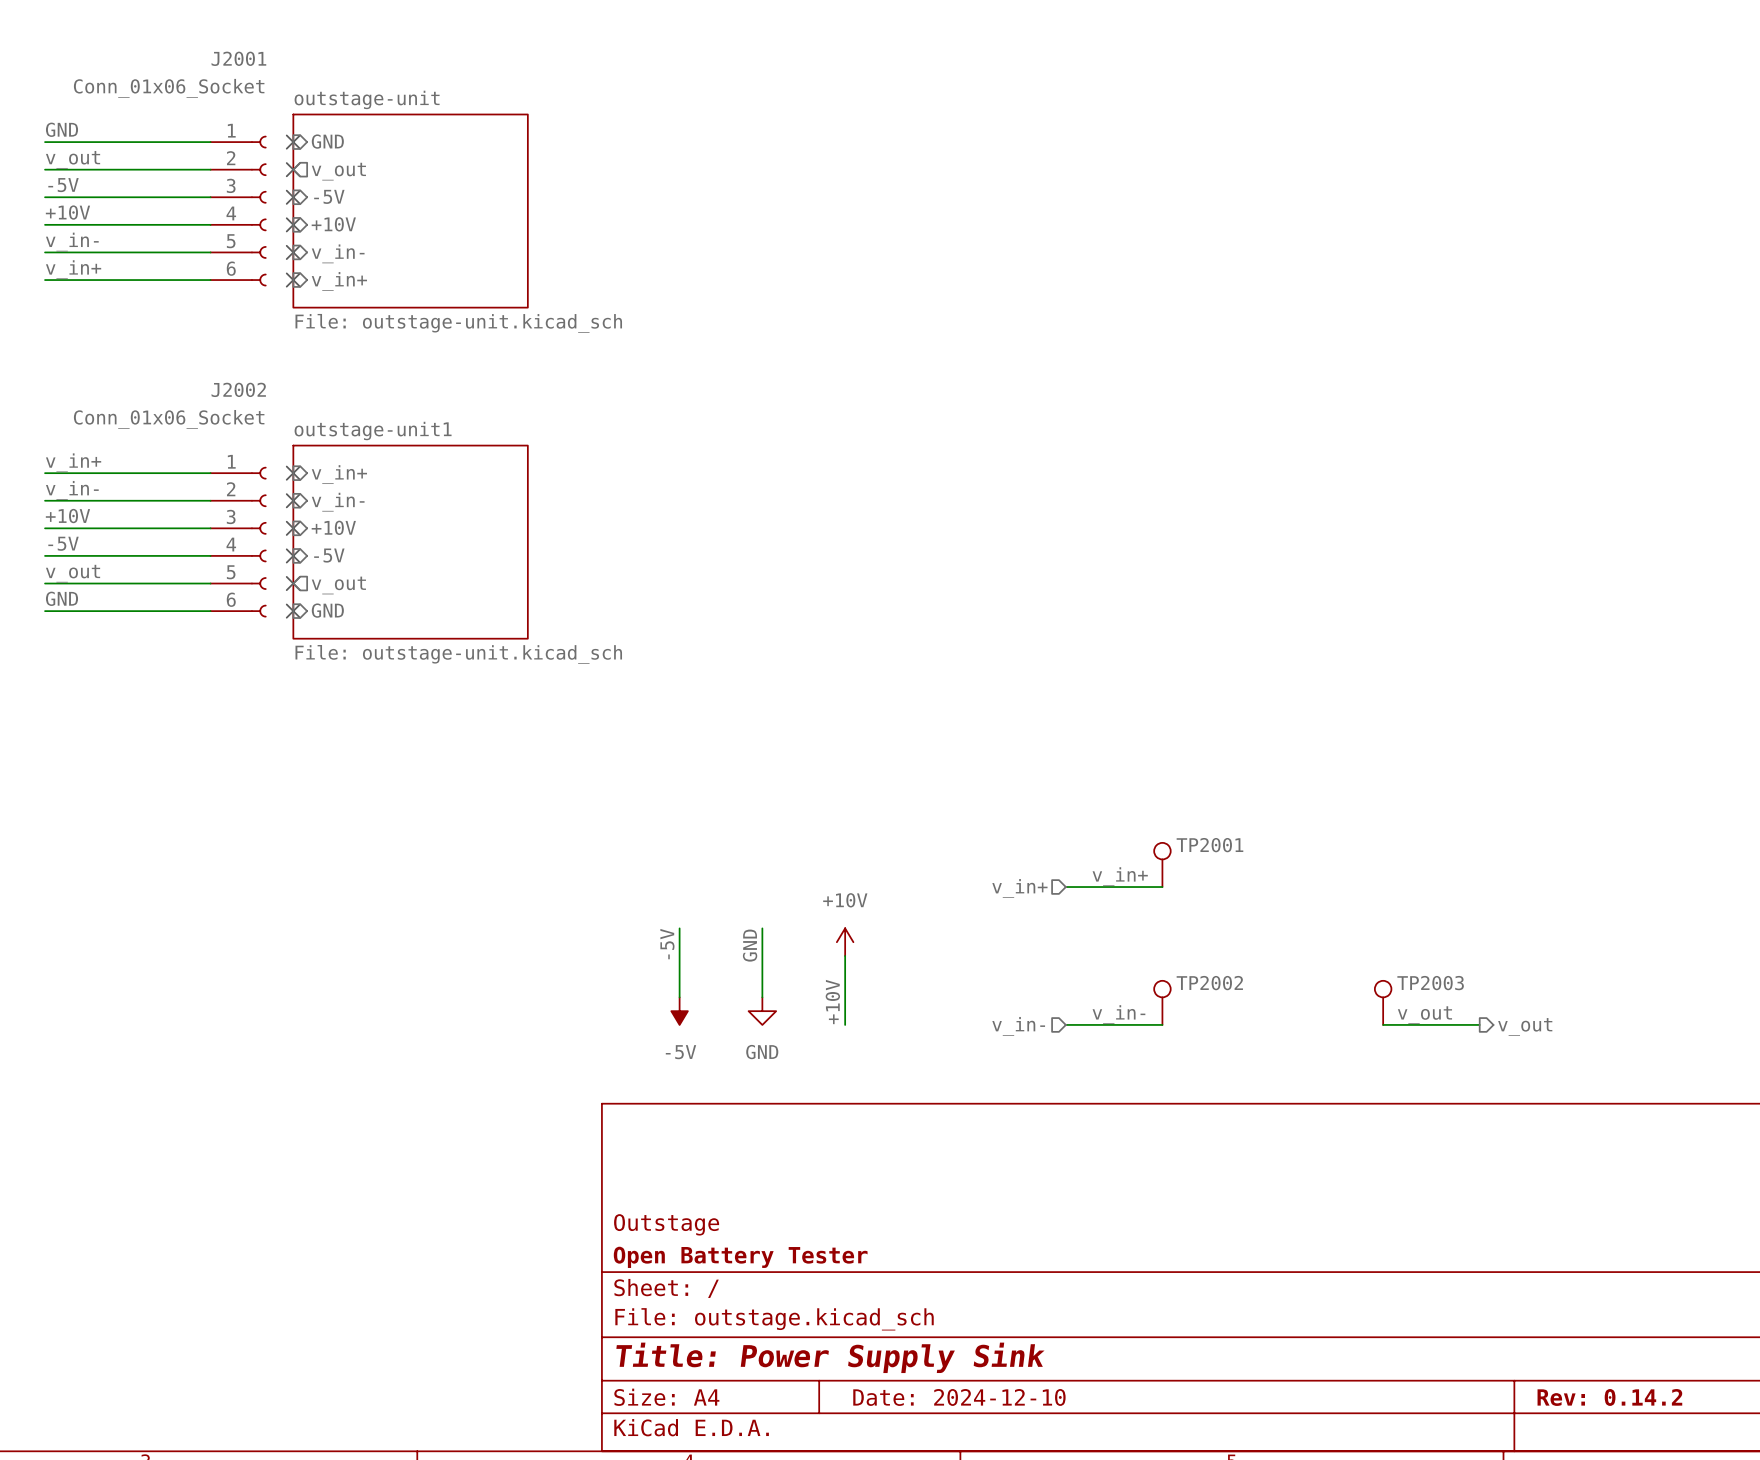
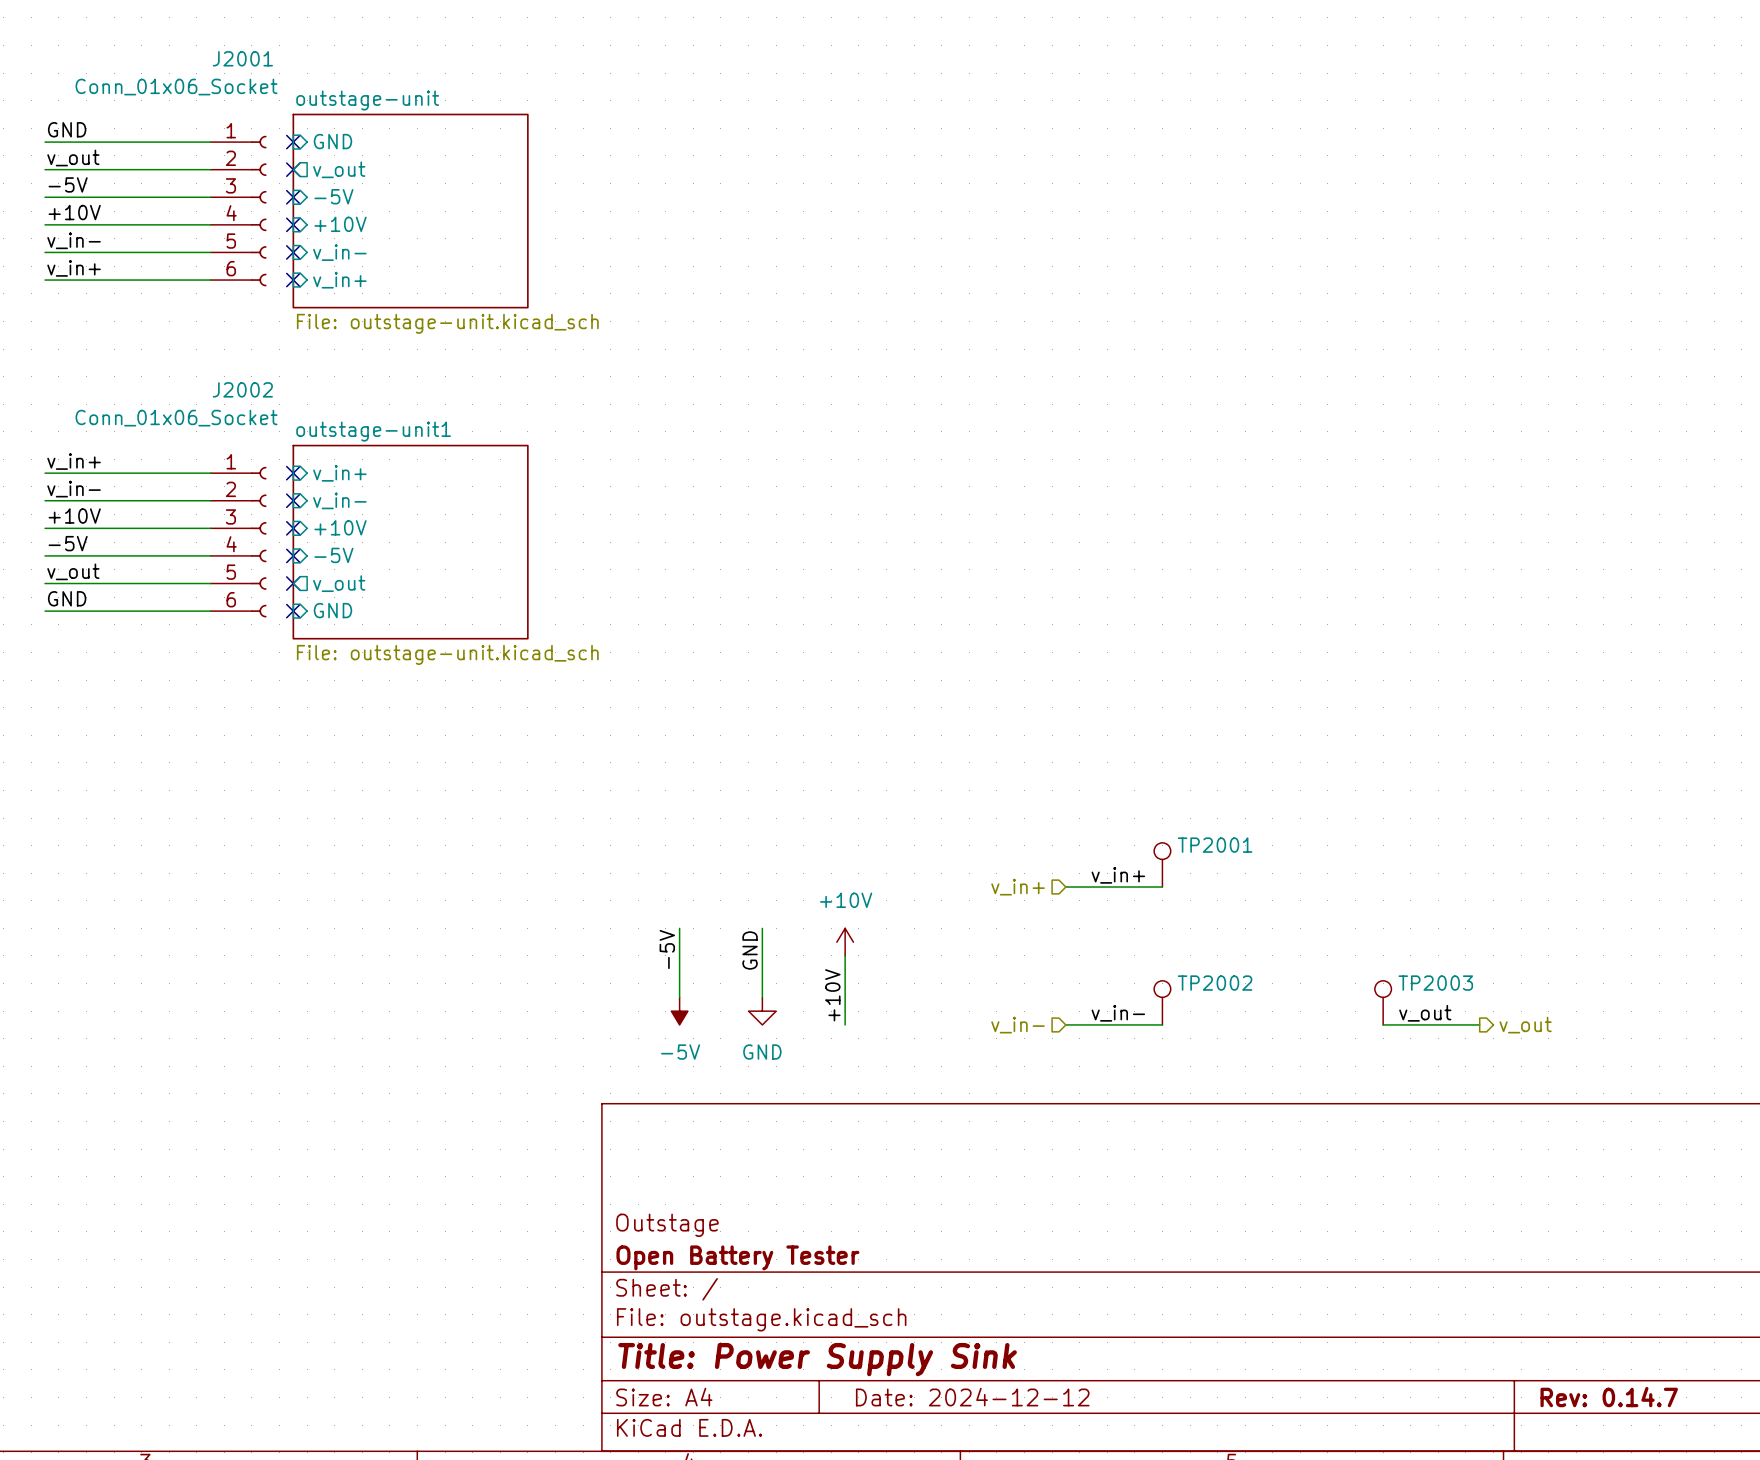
title block: Date: 2024-12-10 (959, 1397) -> Date: 2024-12-12 (972, 1397)
title block: Rev: 0.14.2 (1609, 1397) -> Rev: 0.14.7 (1609, 1397)

